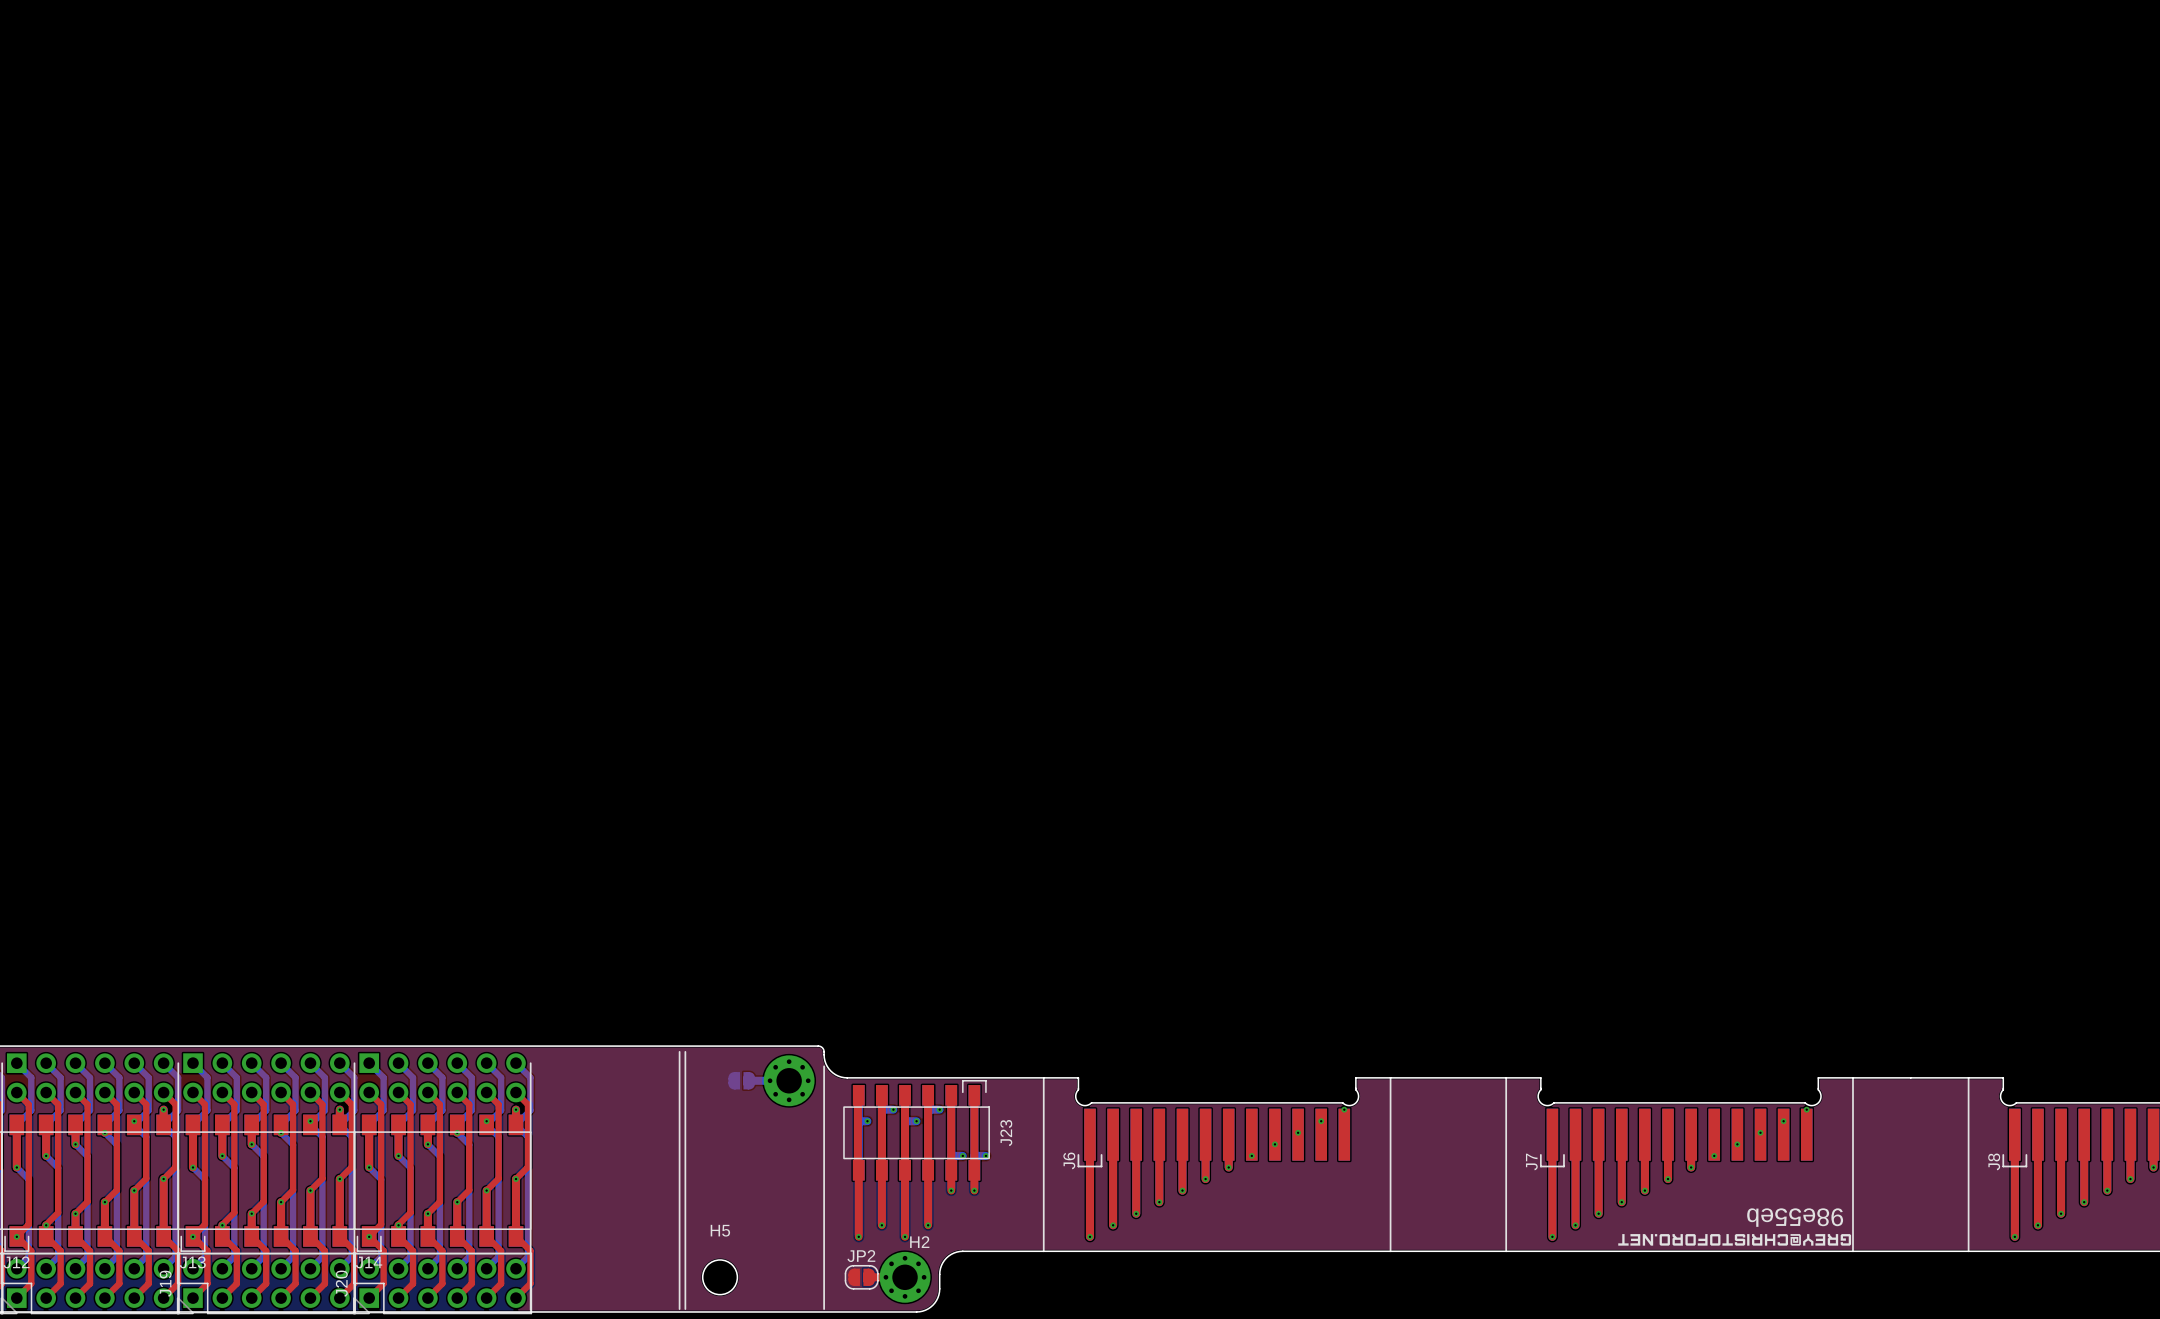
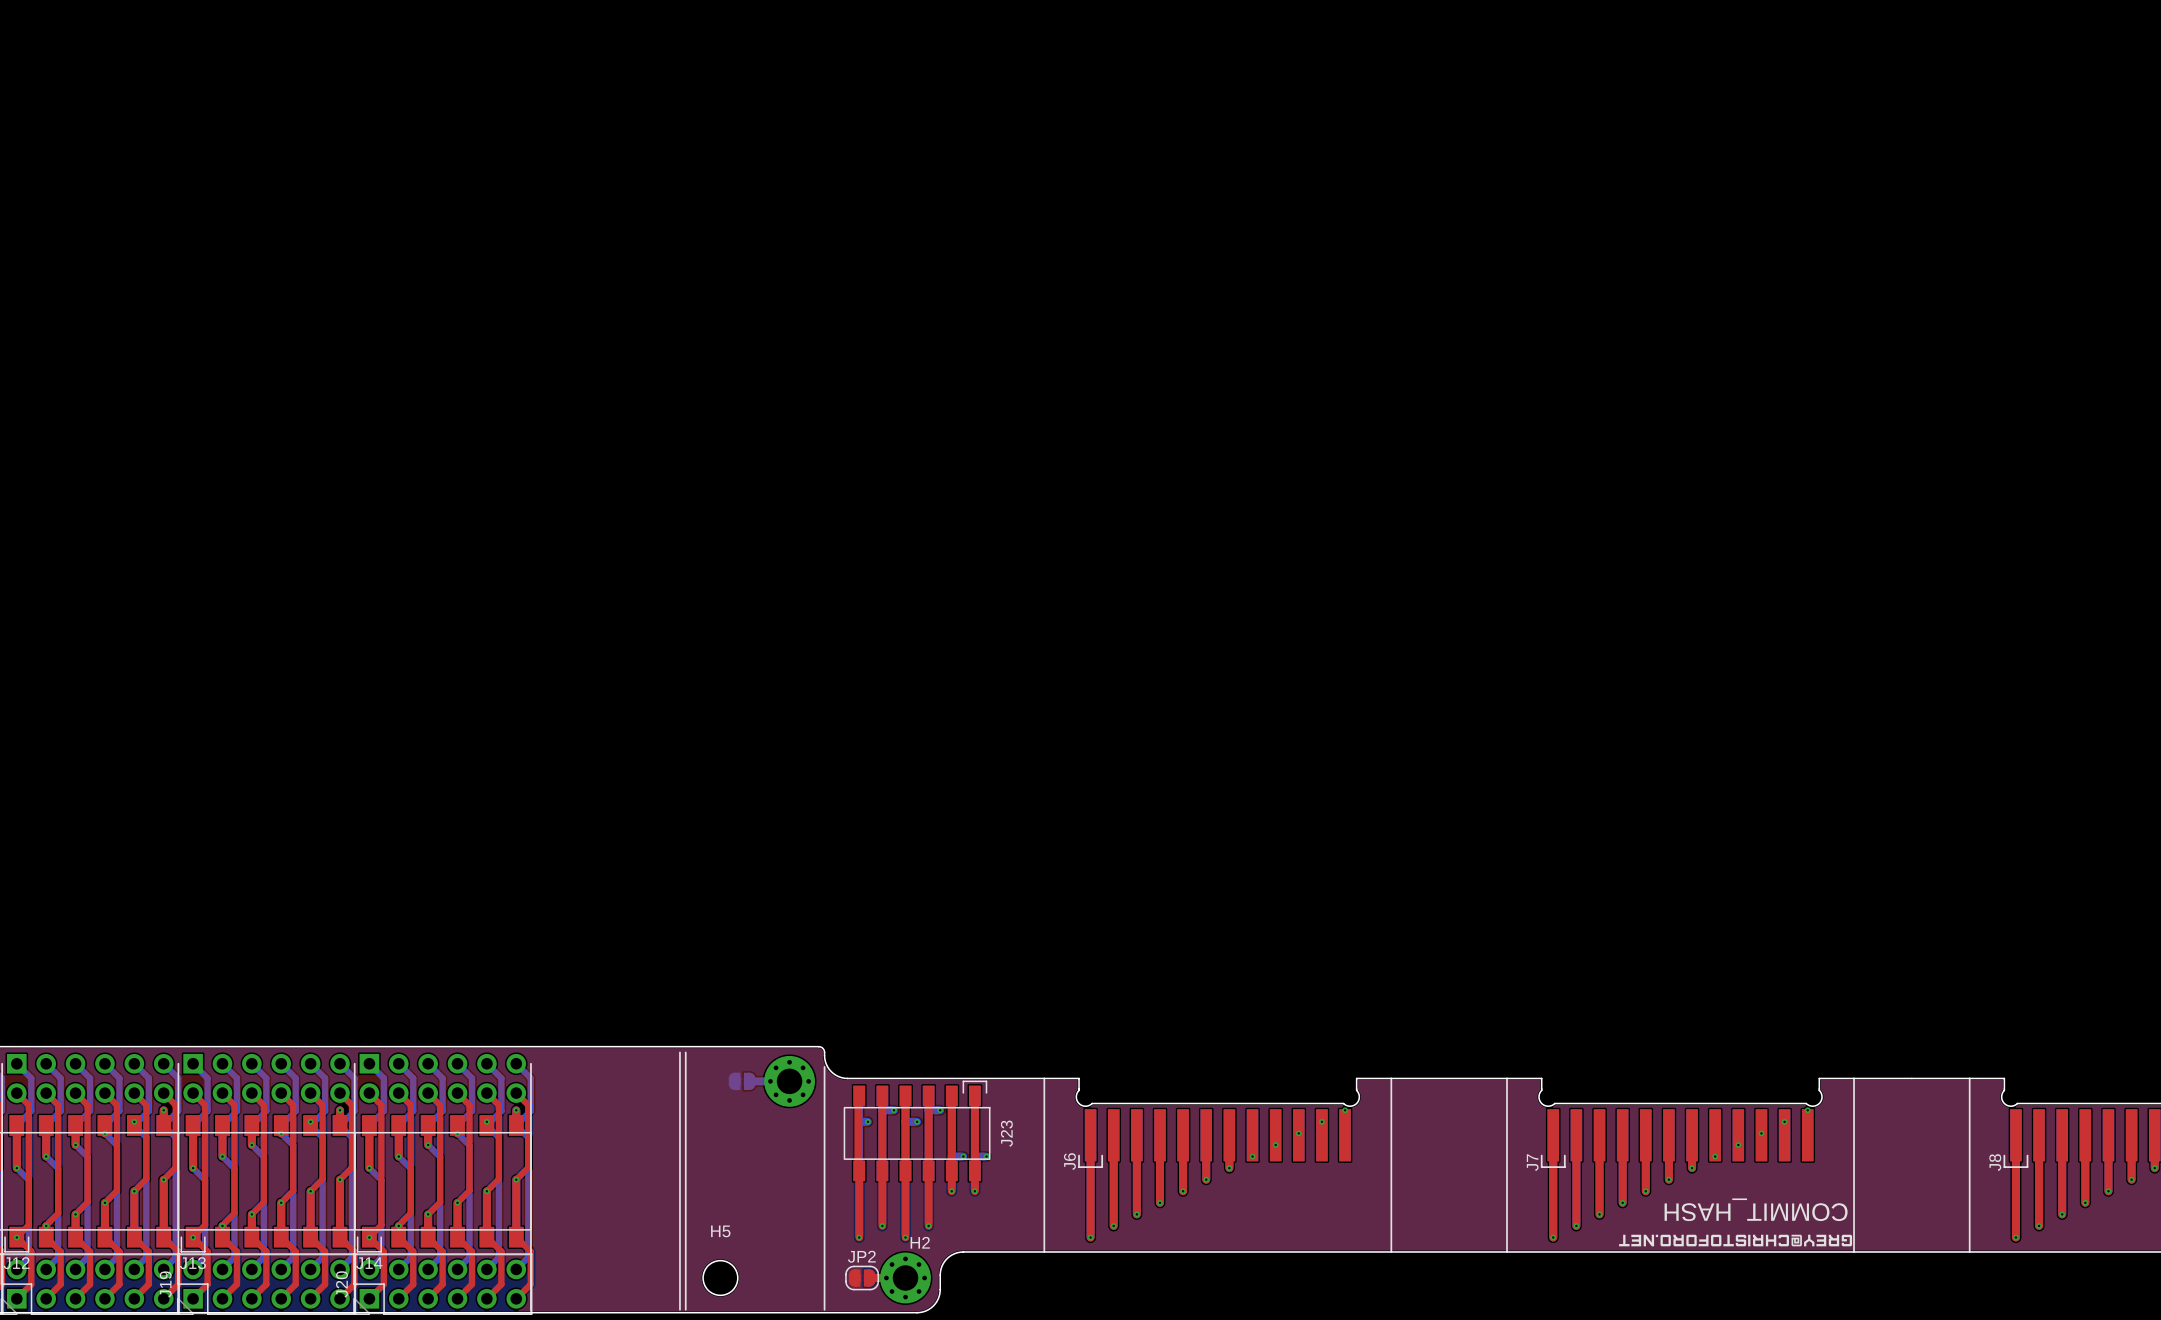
text: none -> COMMIT_HASH (1756, 1209)
text: 98e55eb (1795, 1217) -> none

